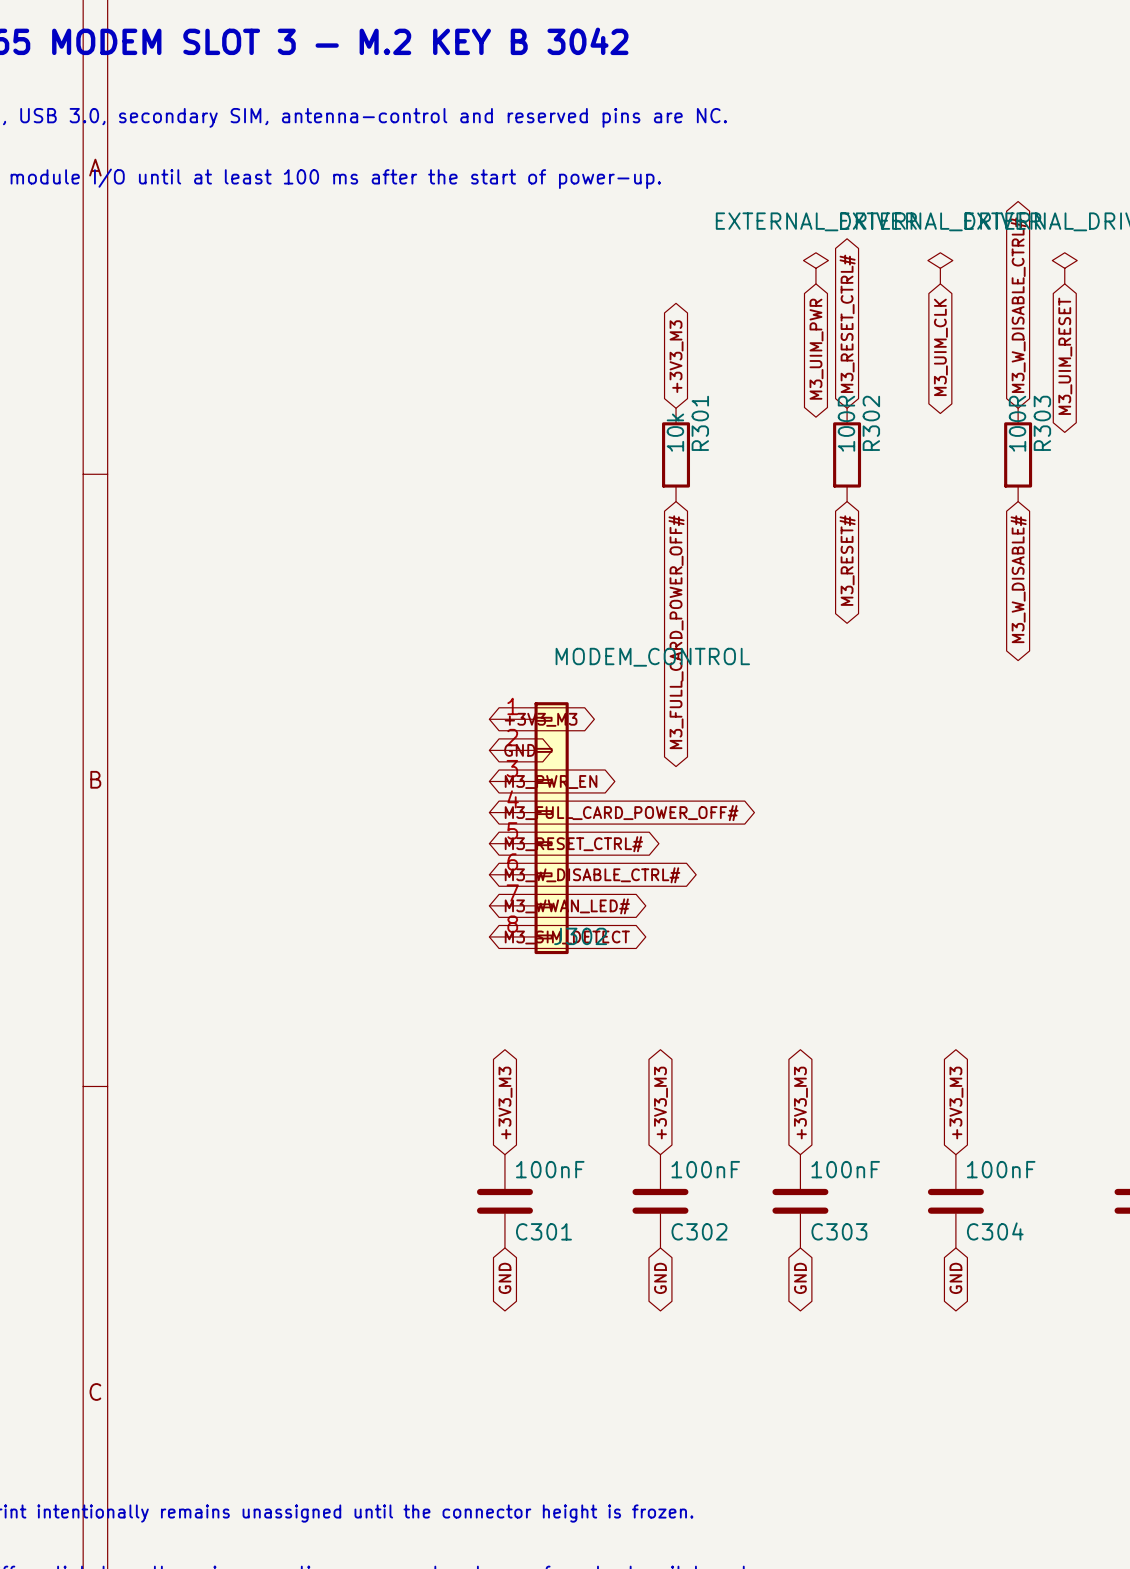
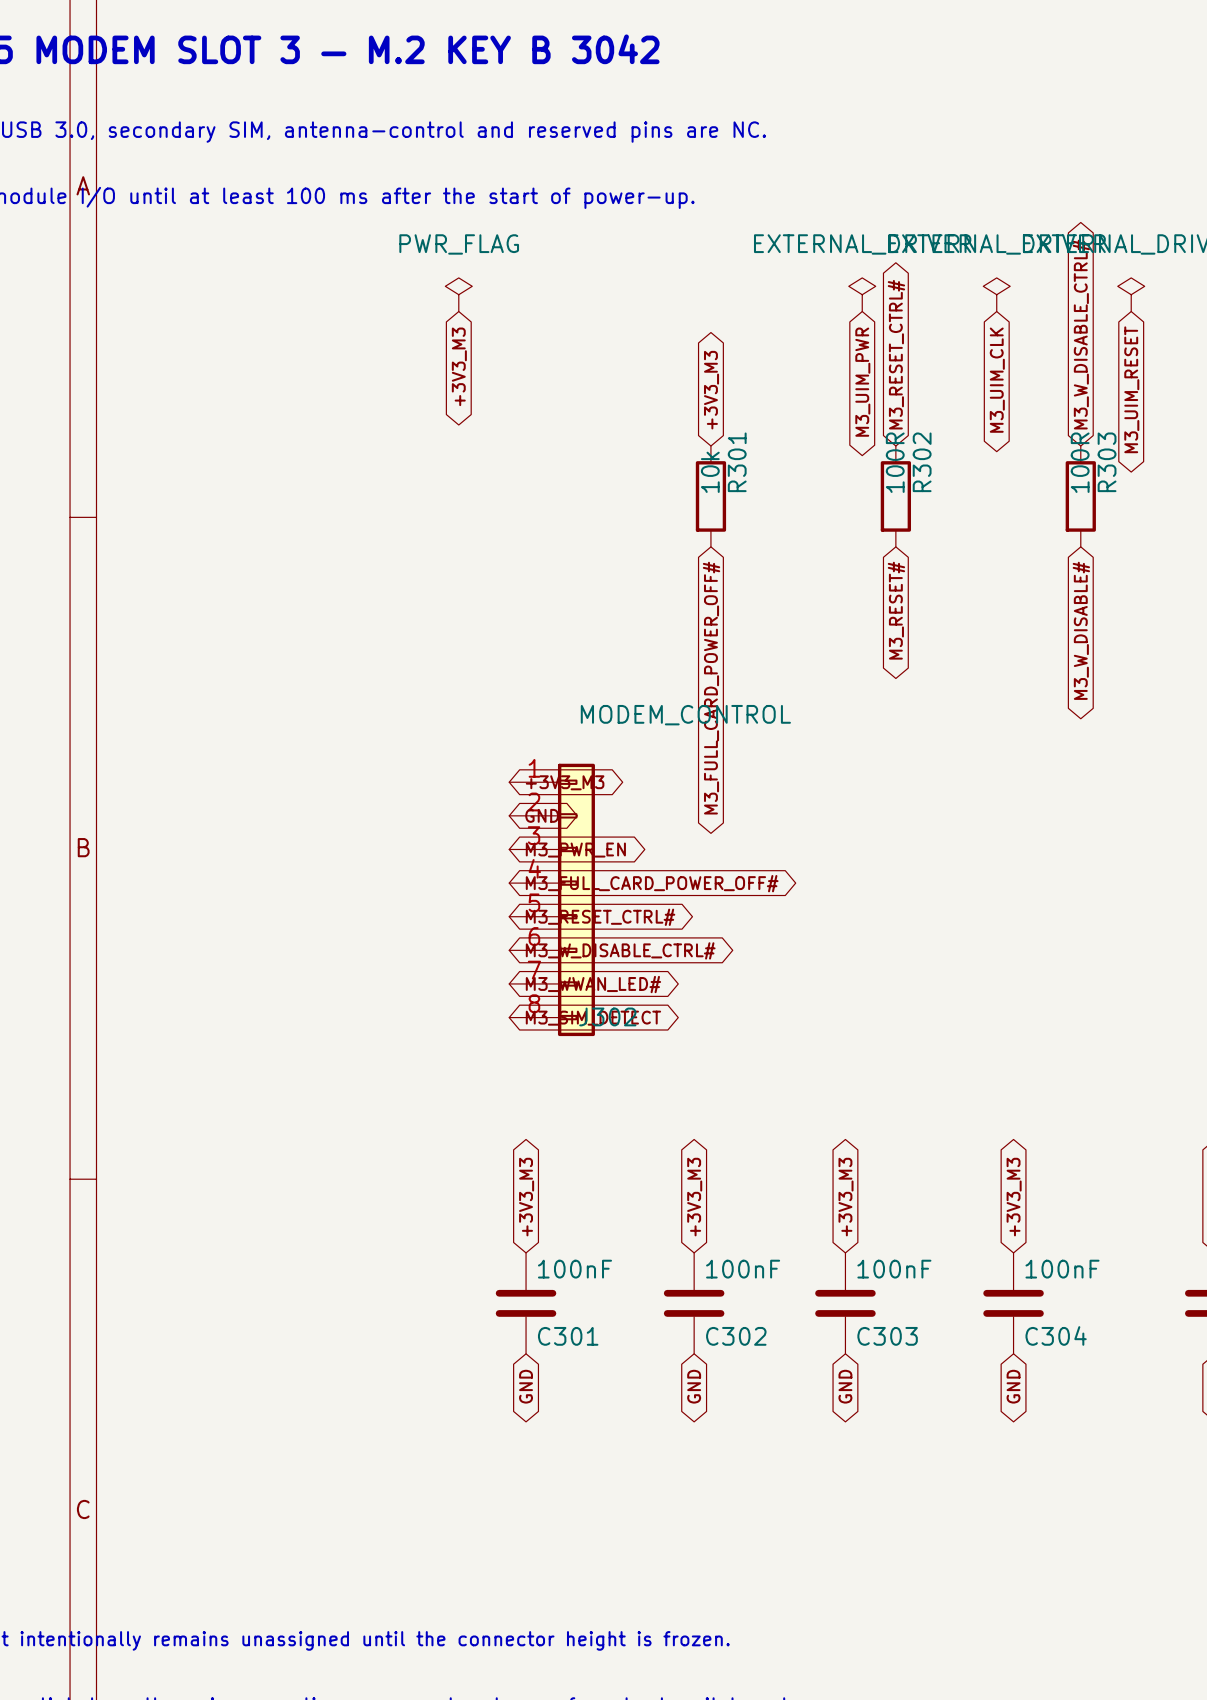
power symbol: none -> PWR_FLAG (458, 294)
global label: none -> +3V3_M3 (459, 366)

